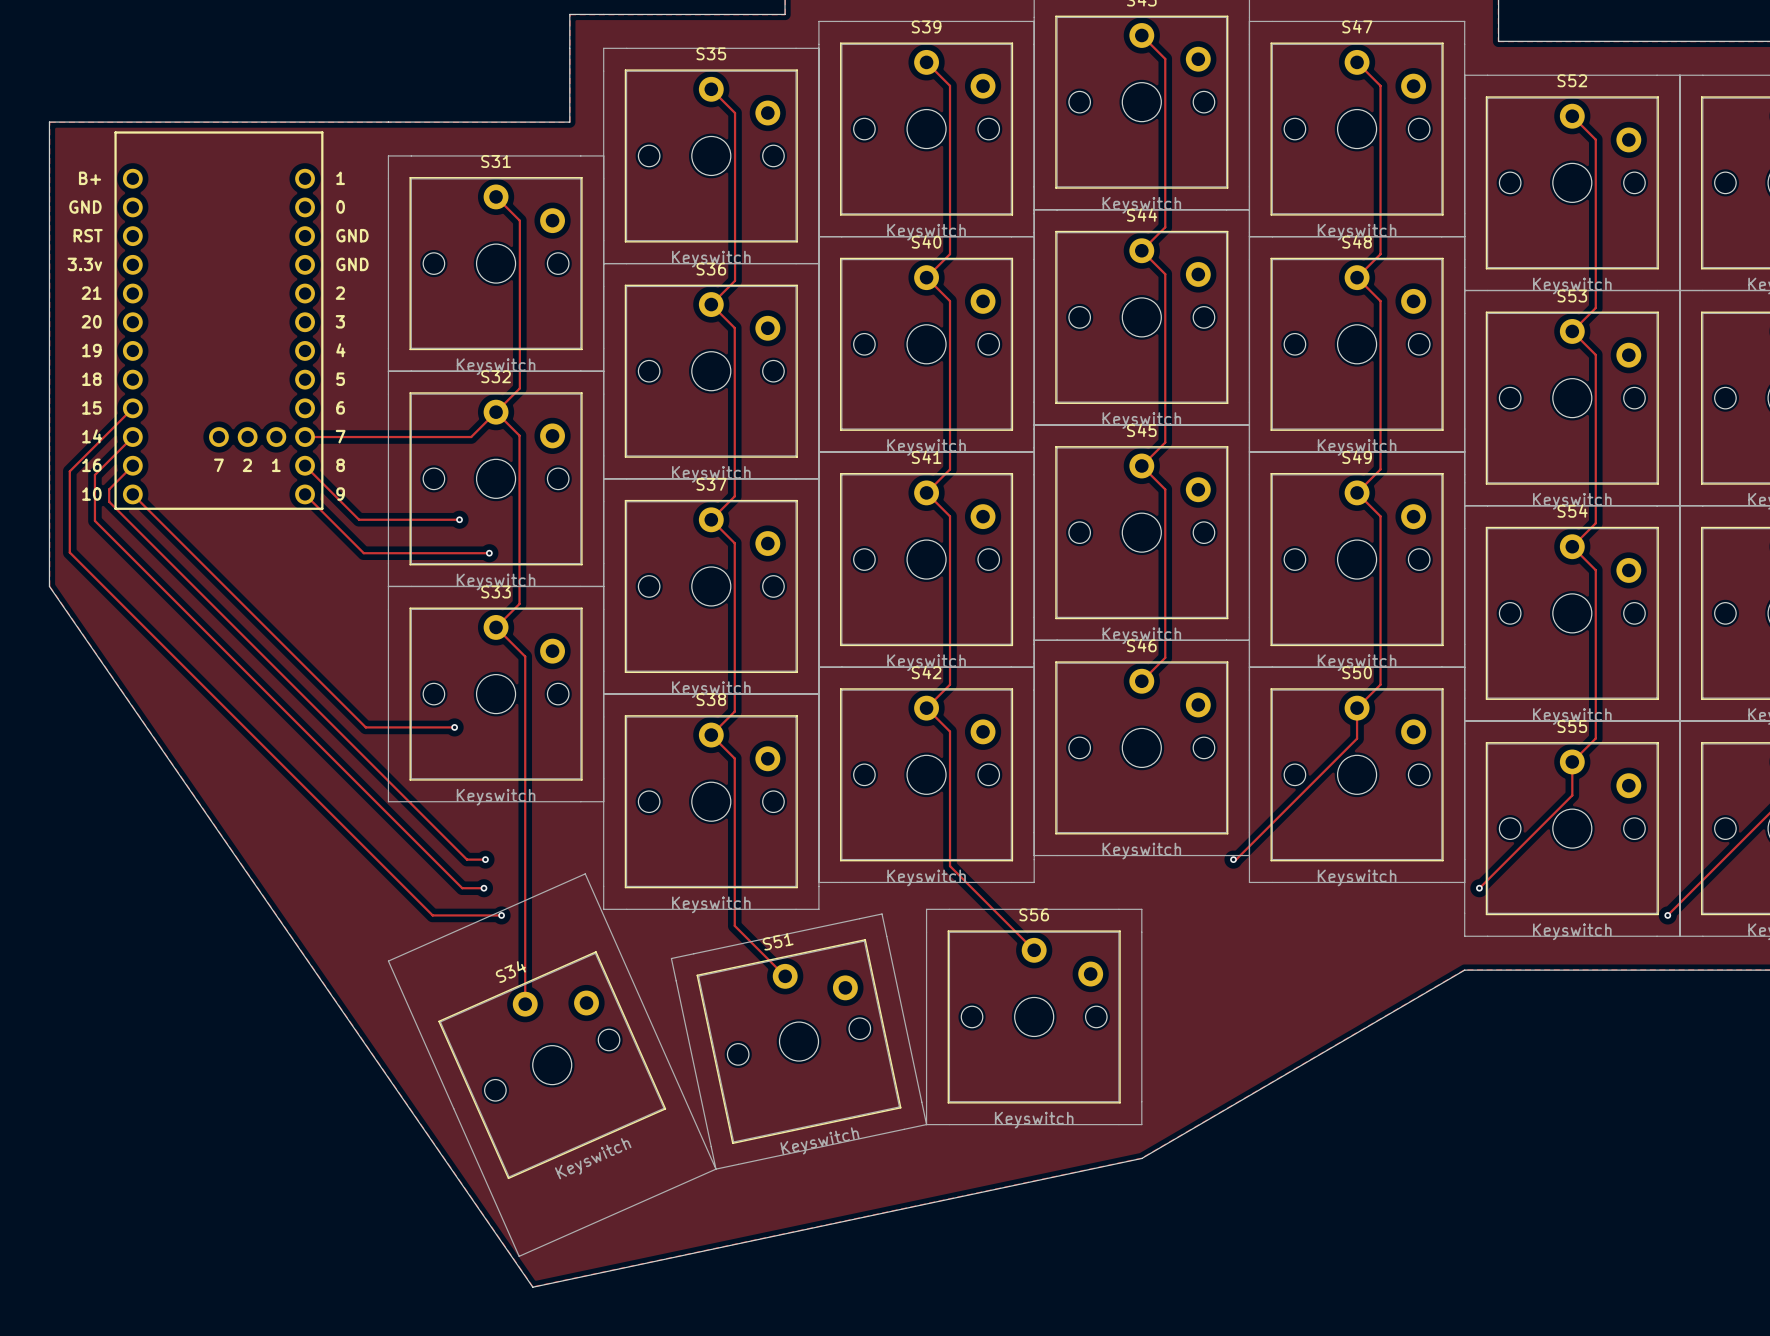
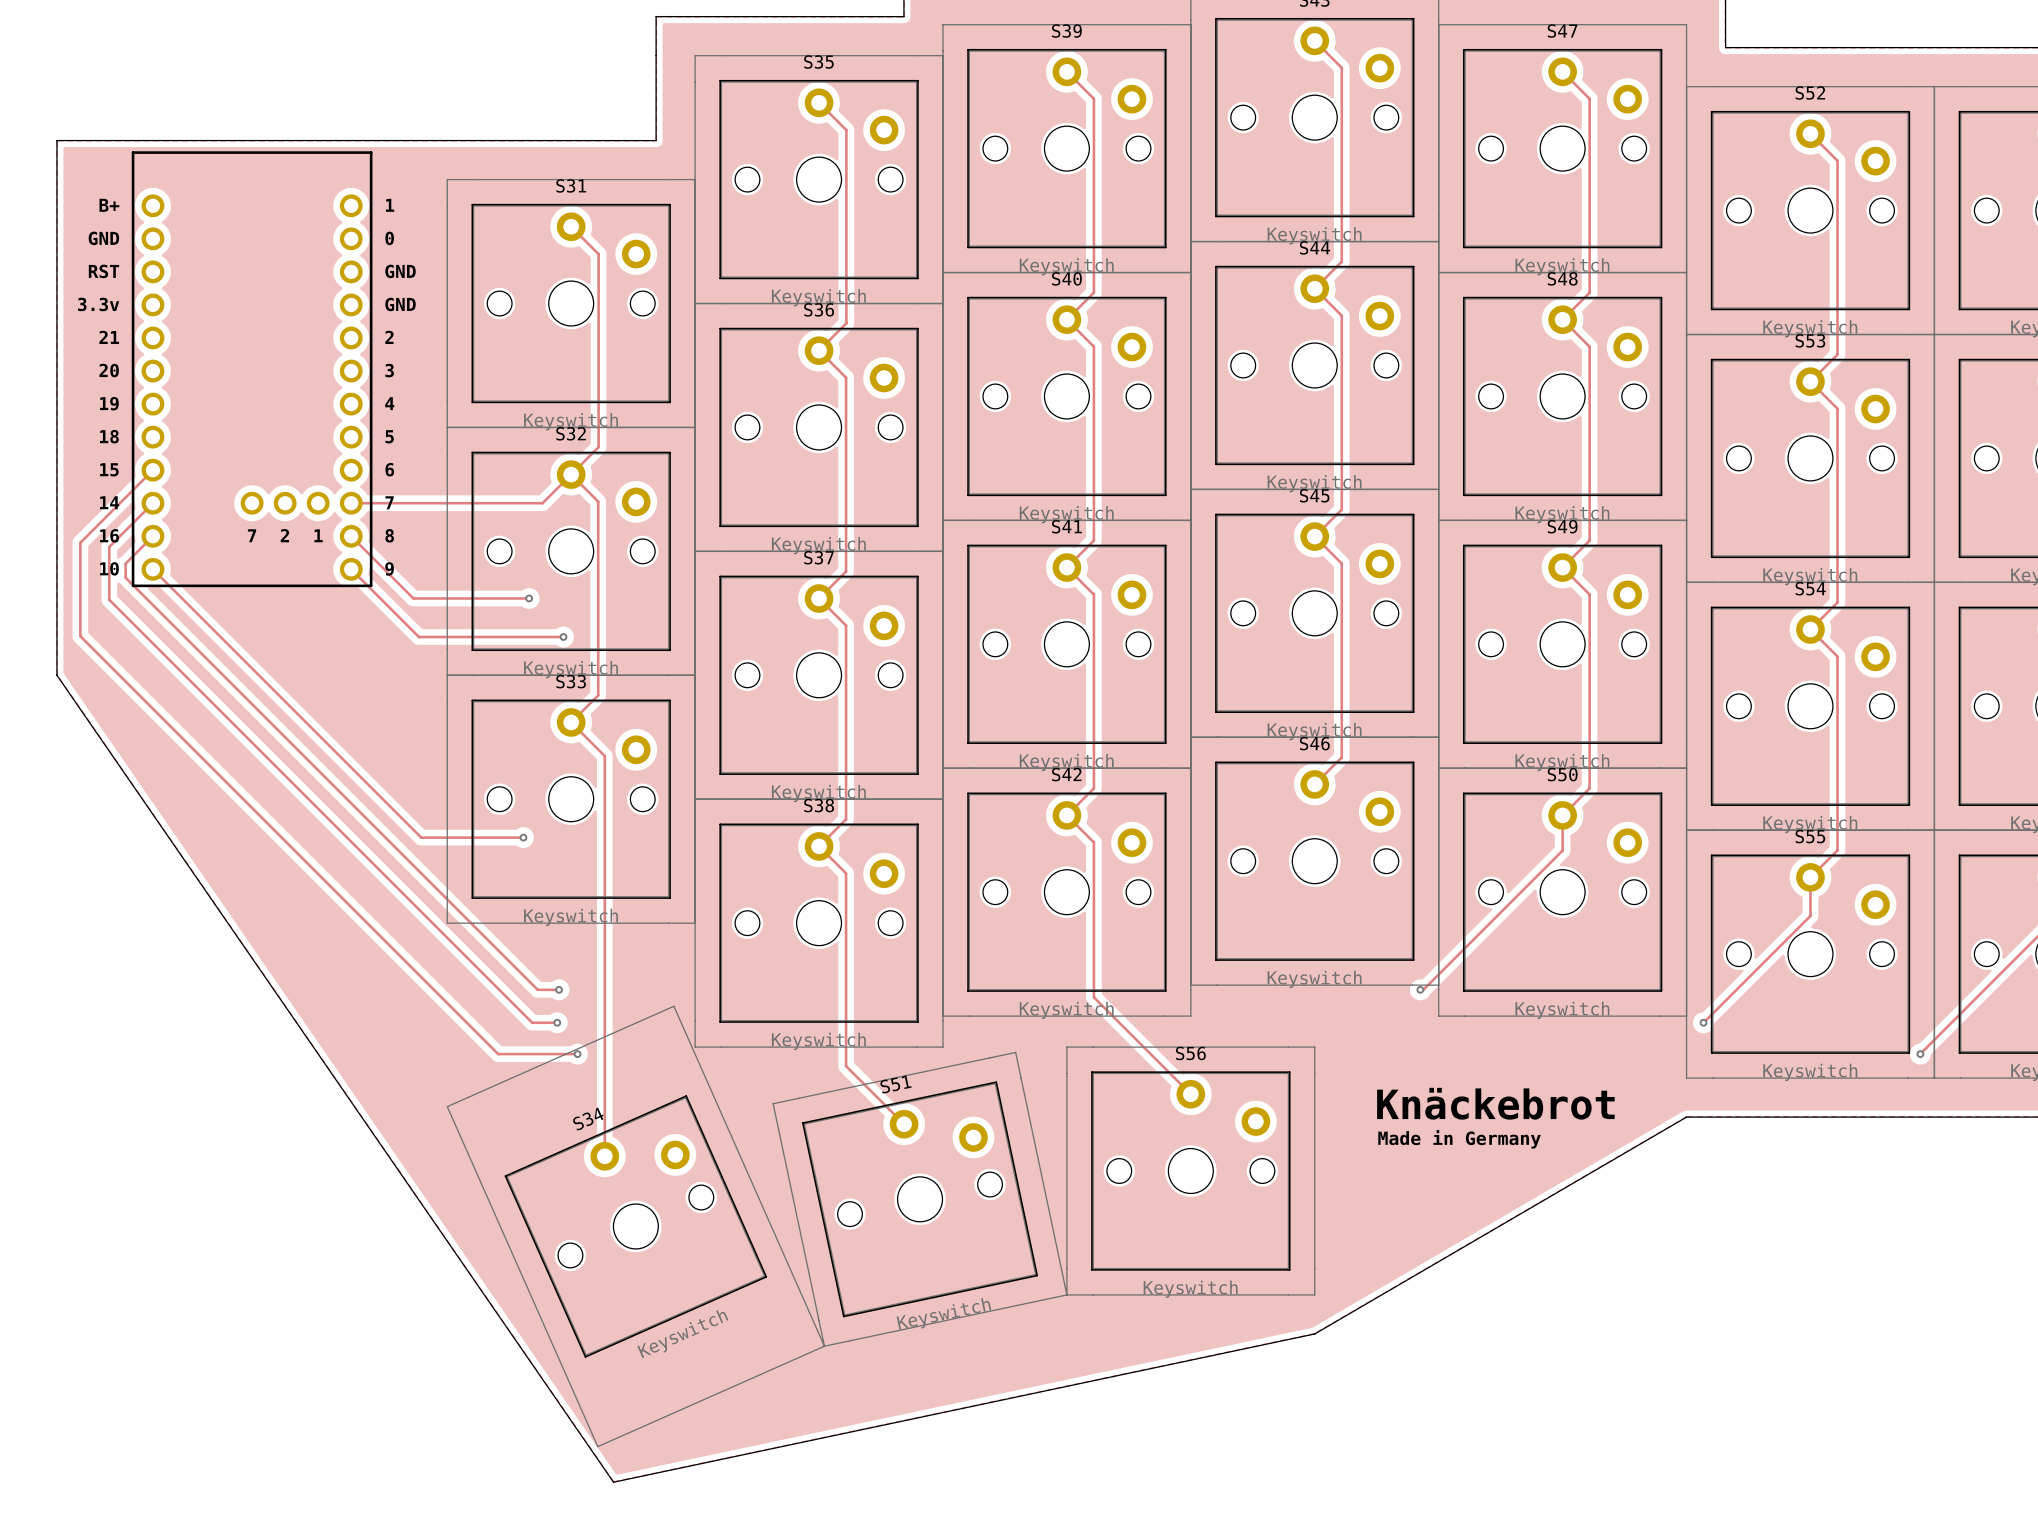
text: none -> Knäckebrot (1495, 1103)
text: none -> Made in Germany (1459, 1139)

